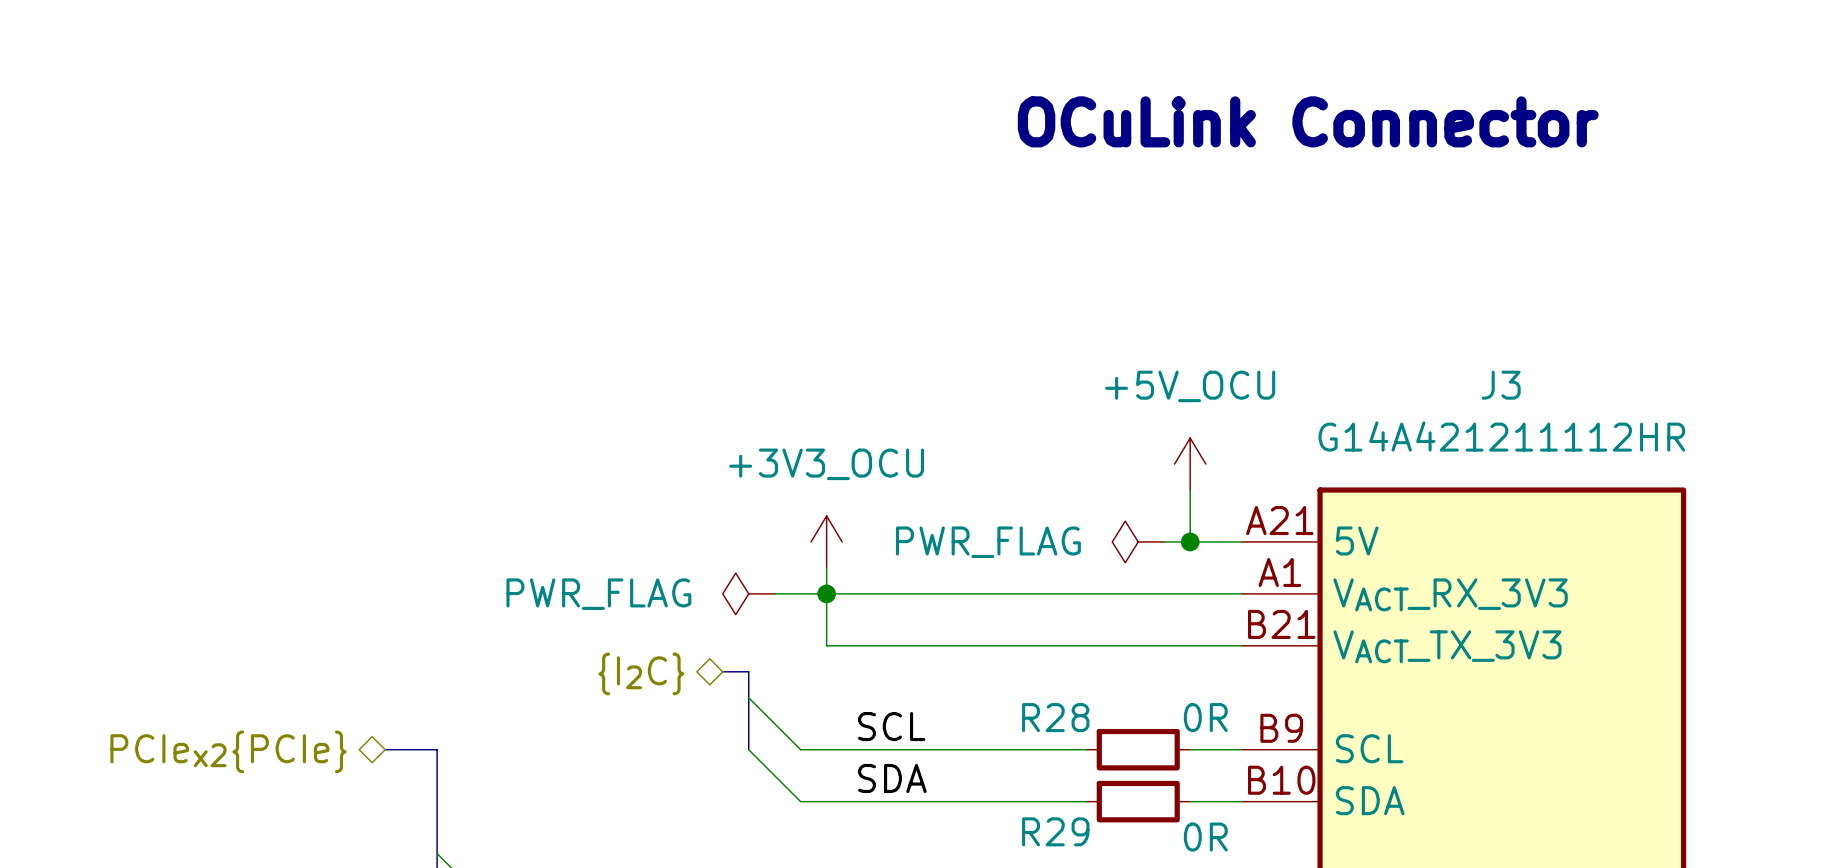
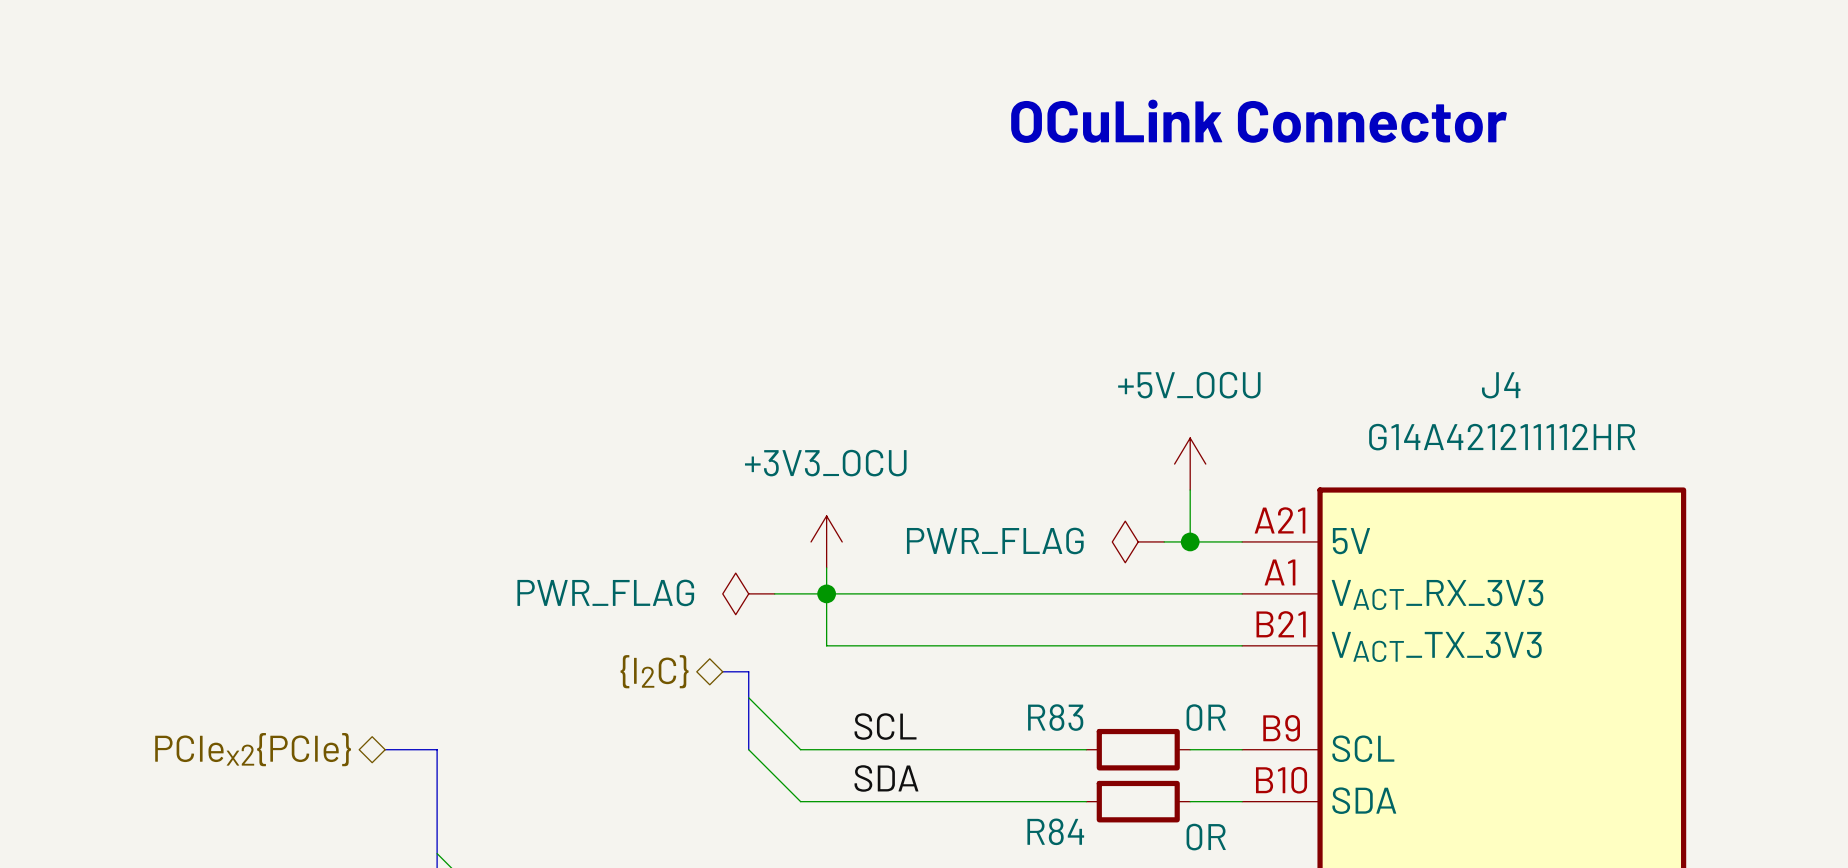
J3 name: J3 (1501, 385) -> J4 (1501, 385)
R28 name: R28 (1055, 717) -> R83 (1055, 717)
R29 name: R29 (1055, 831) -> R84 (1055, 831)

